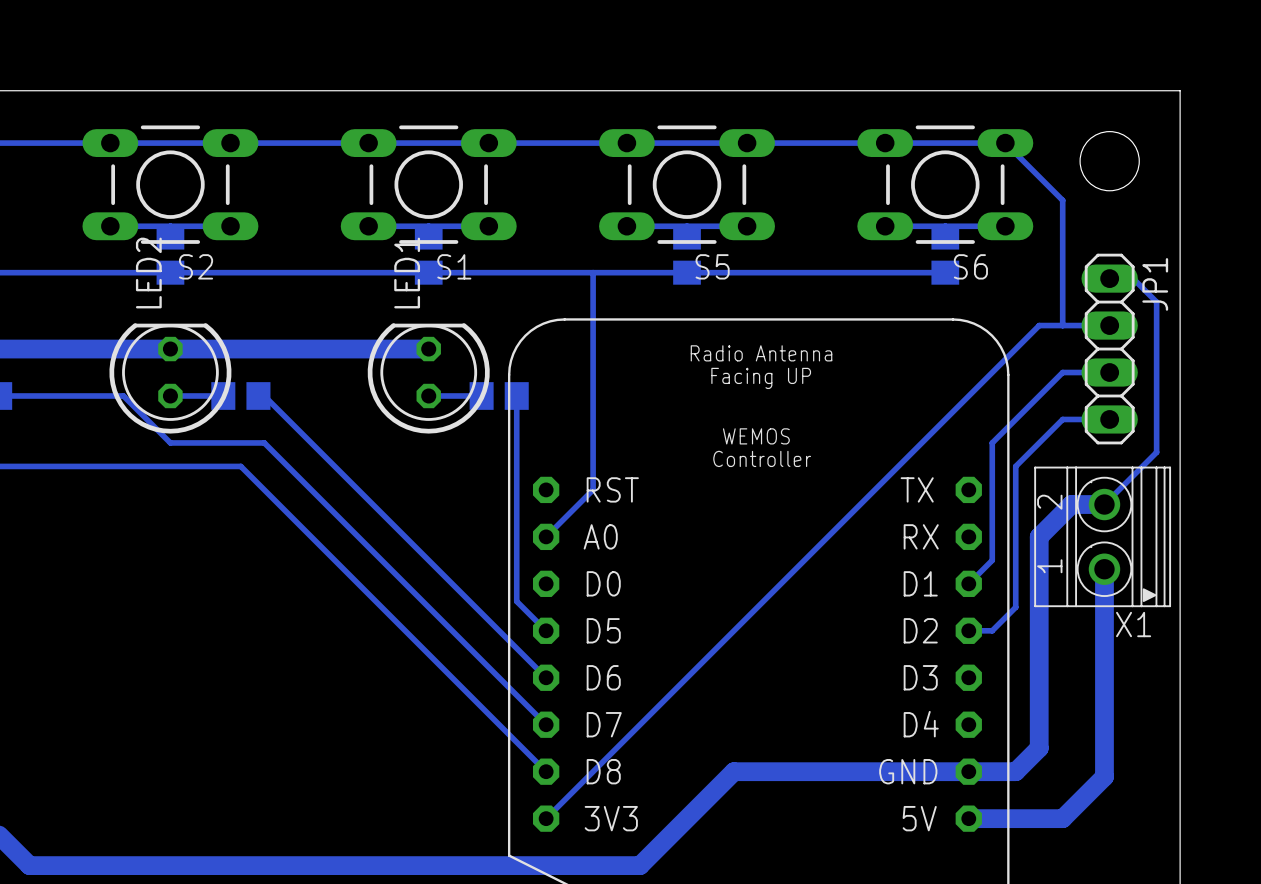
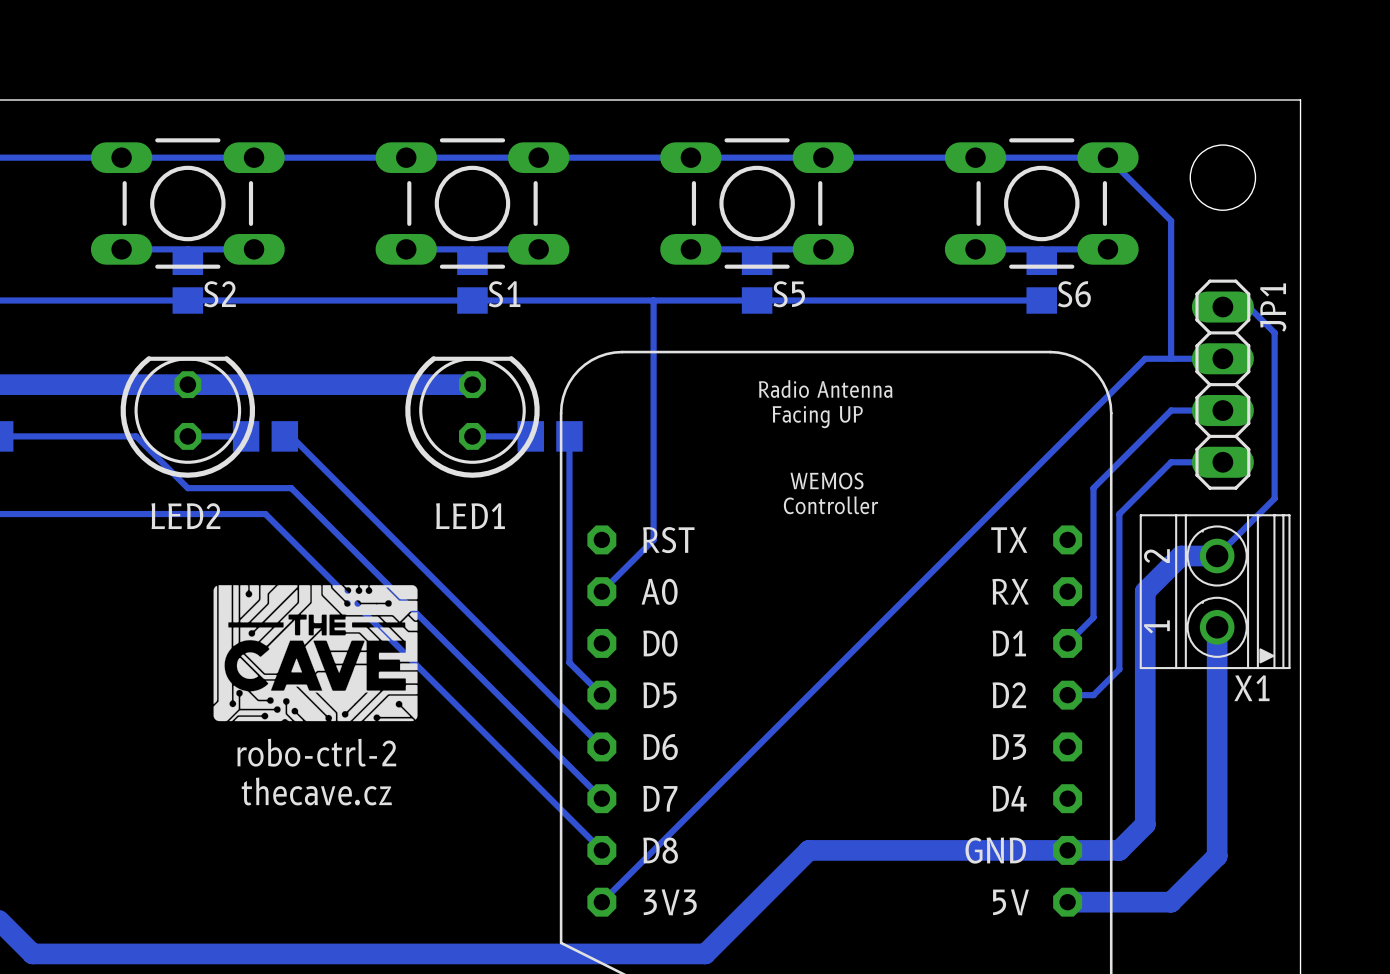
LED2 name rotation: 0° (148, 273) -> 90° clockwise (185, 516)
LED2 name position: LED2 (148, 273) -> LED2 (185, 516)
LED1 name rotation: 0° (407, 273) -> 90° clockwise (470, 516)
LED1 name position: LED1 (407, 273) -> LED1 (470, 516)
drawing: none -> [213, 585, 418, 722]
text: none -> robo-ctrl-2 (316, 752)
text: none -> thecave.cz (316, 791)

